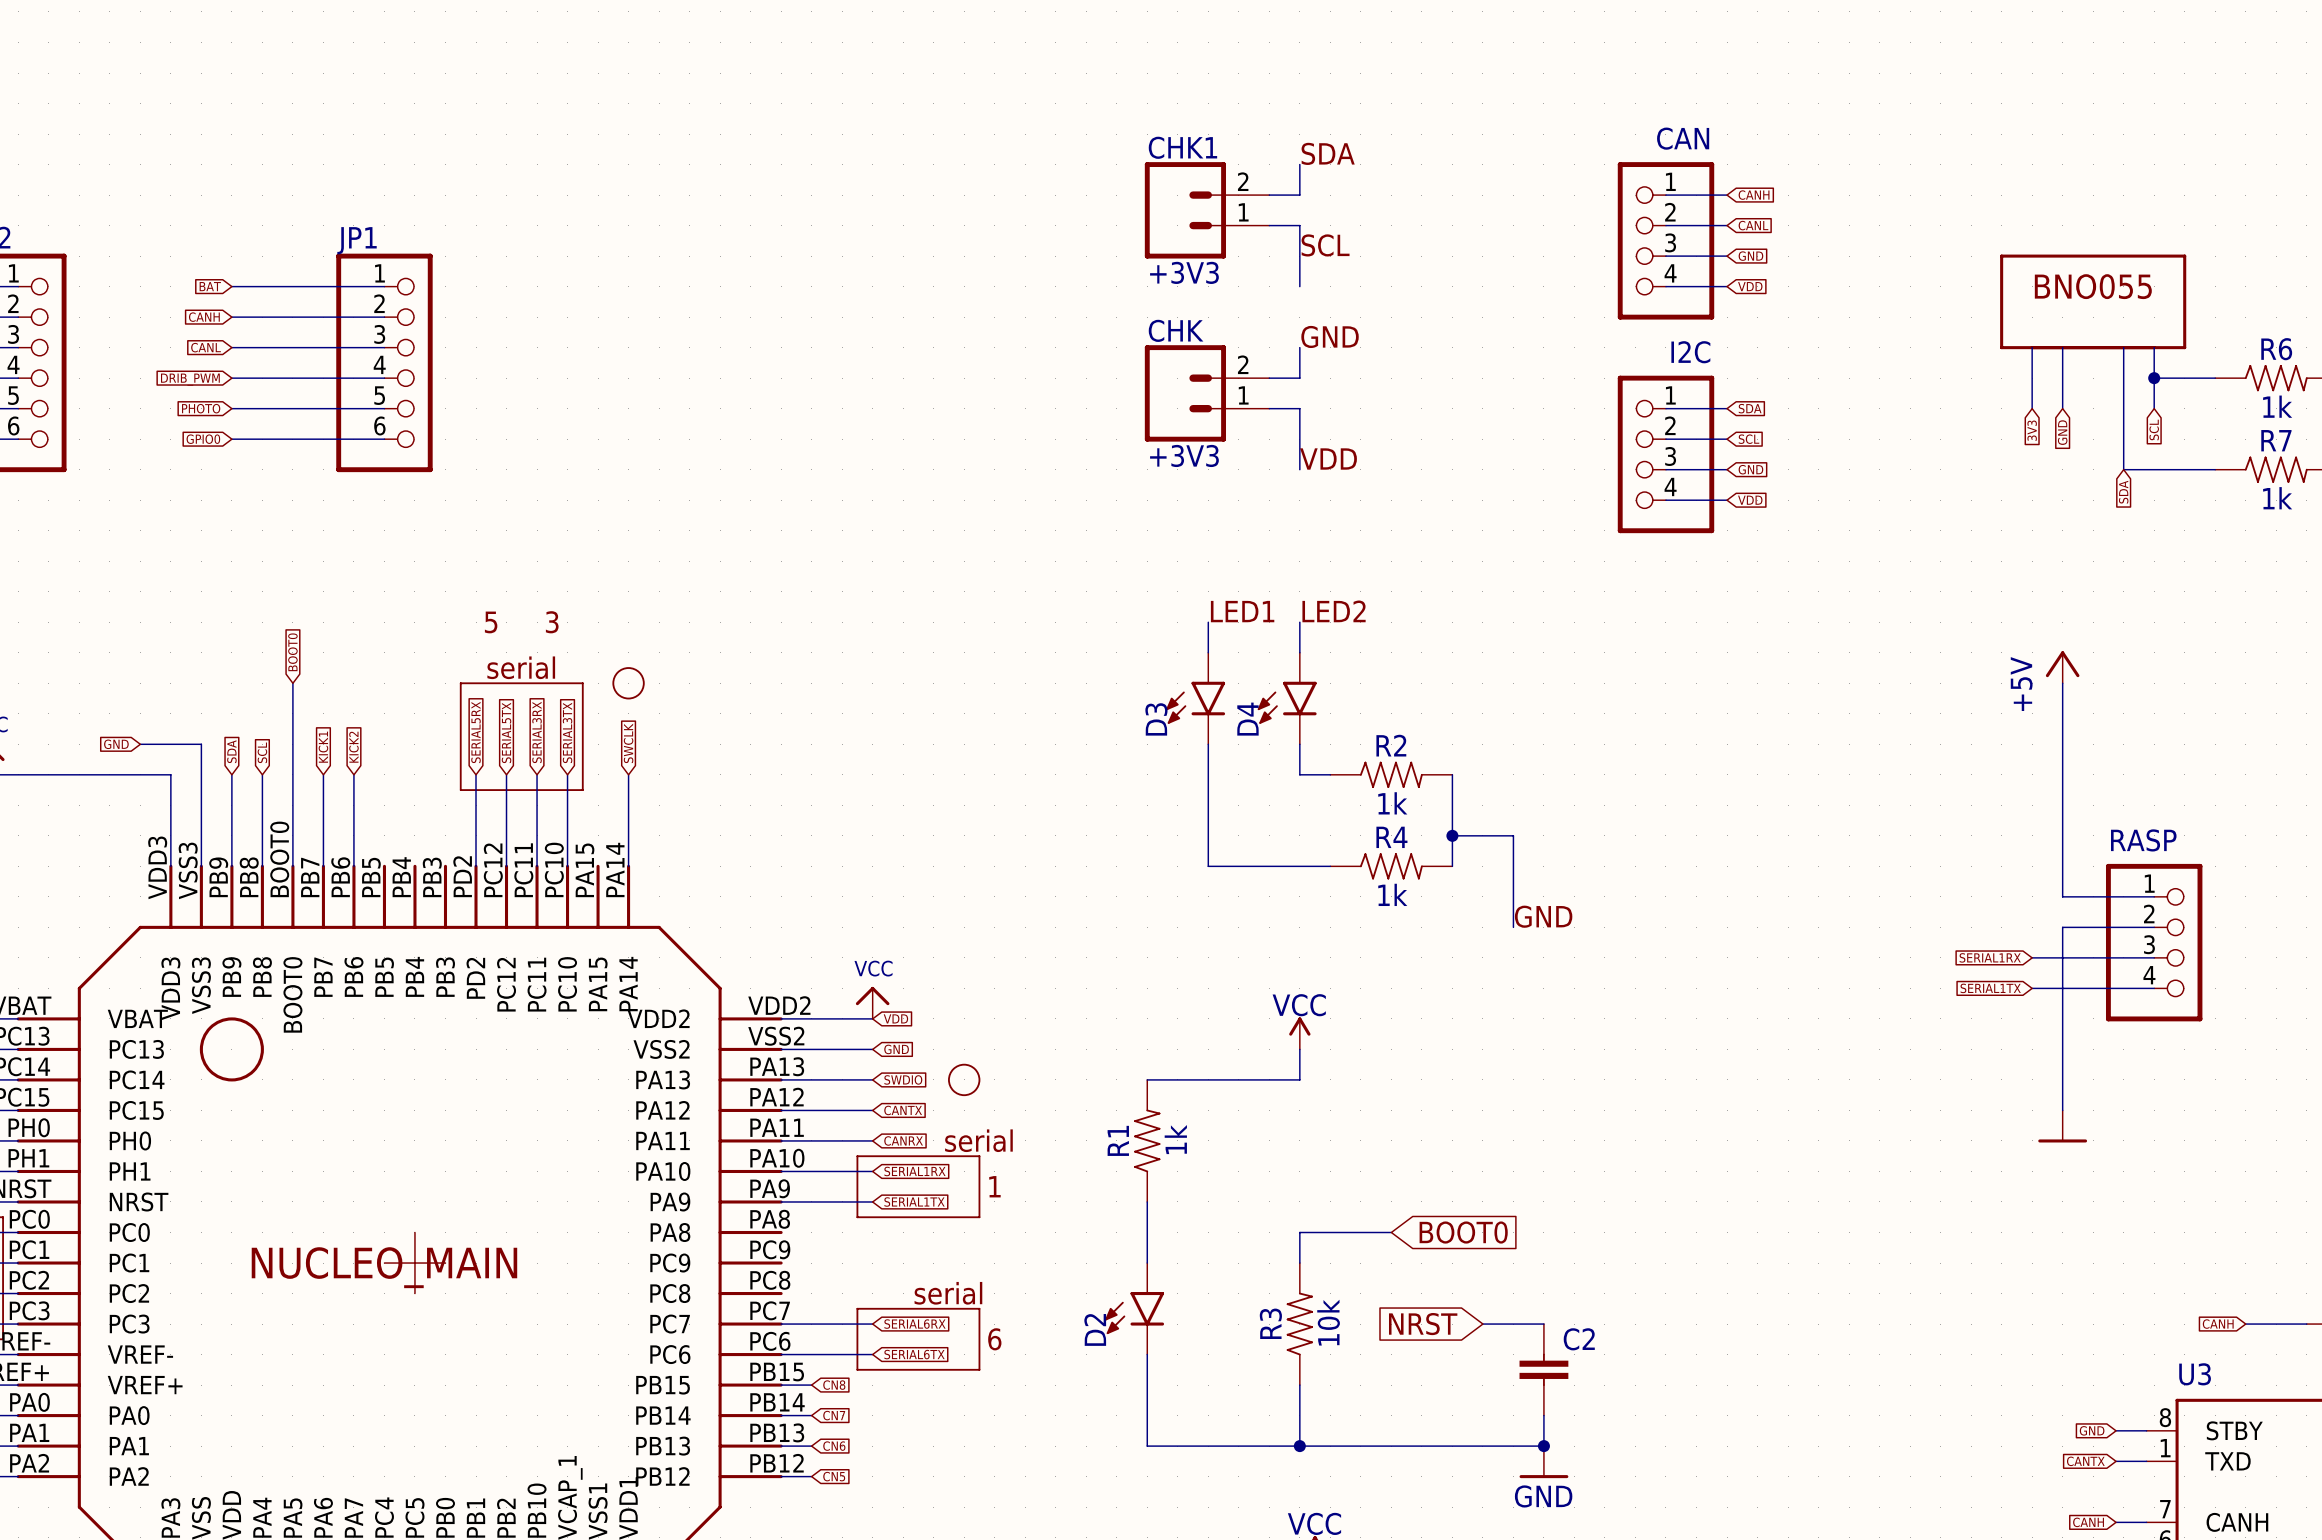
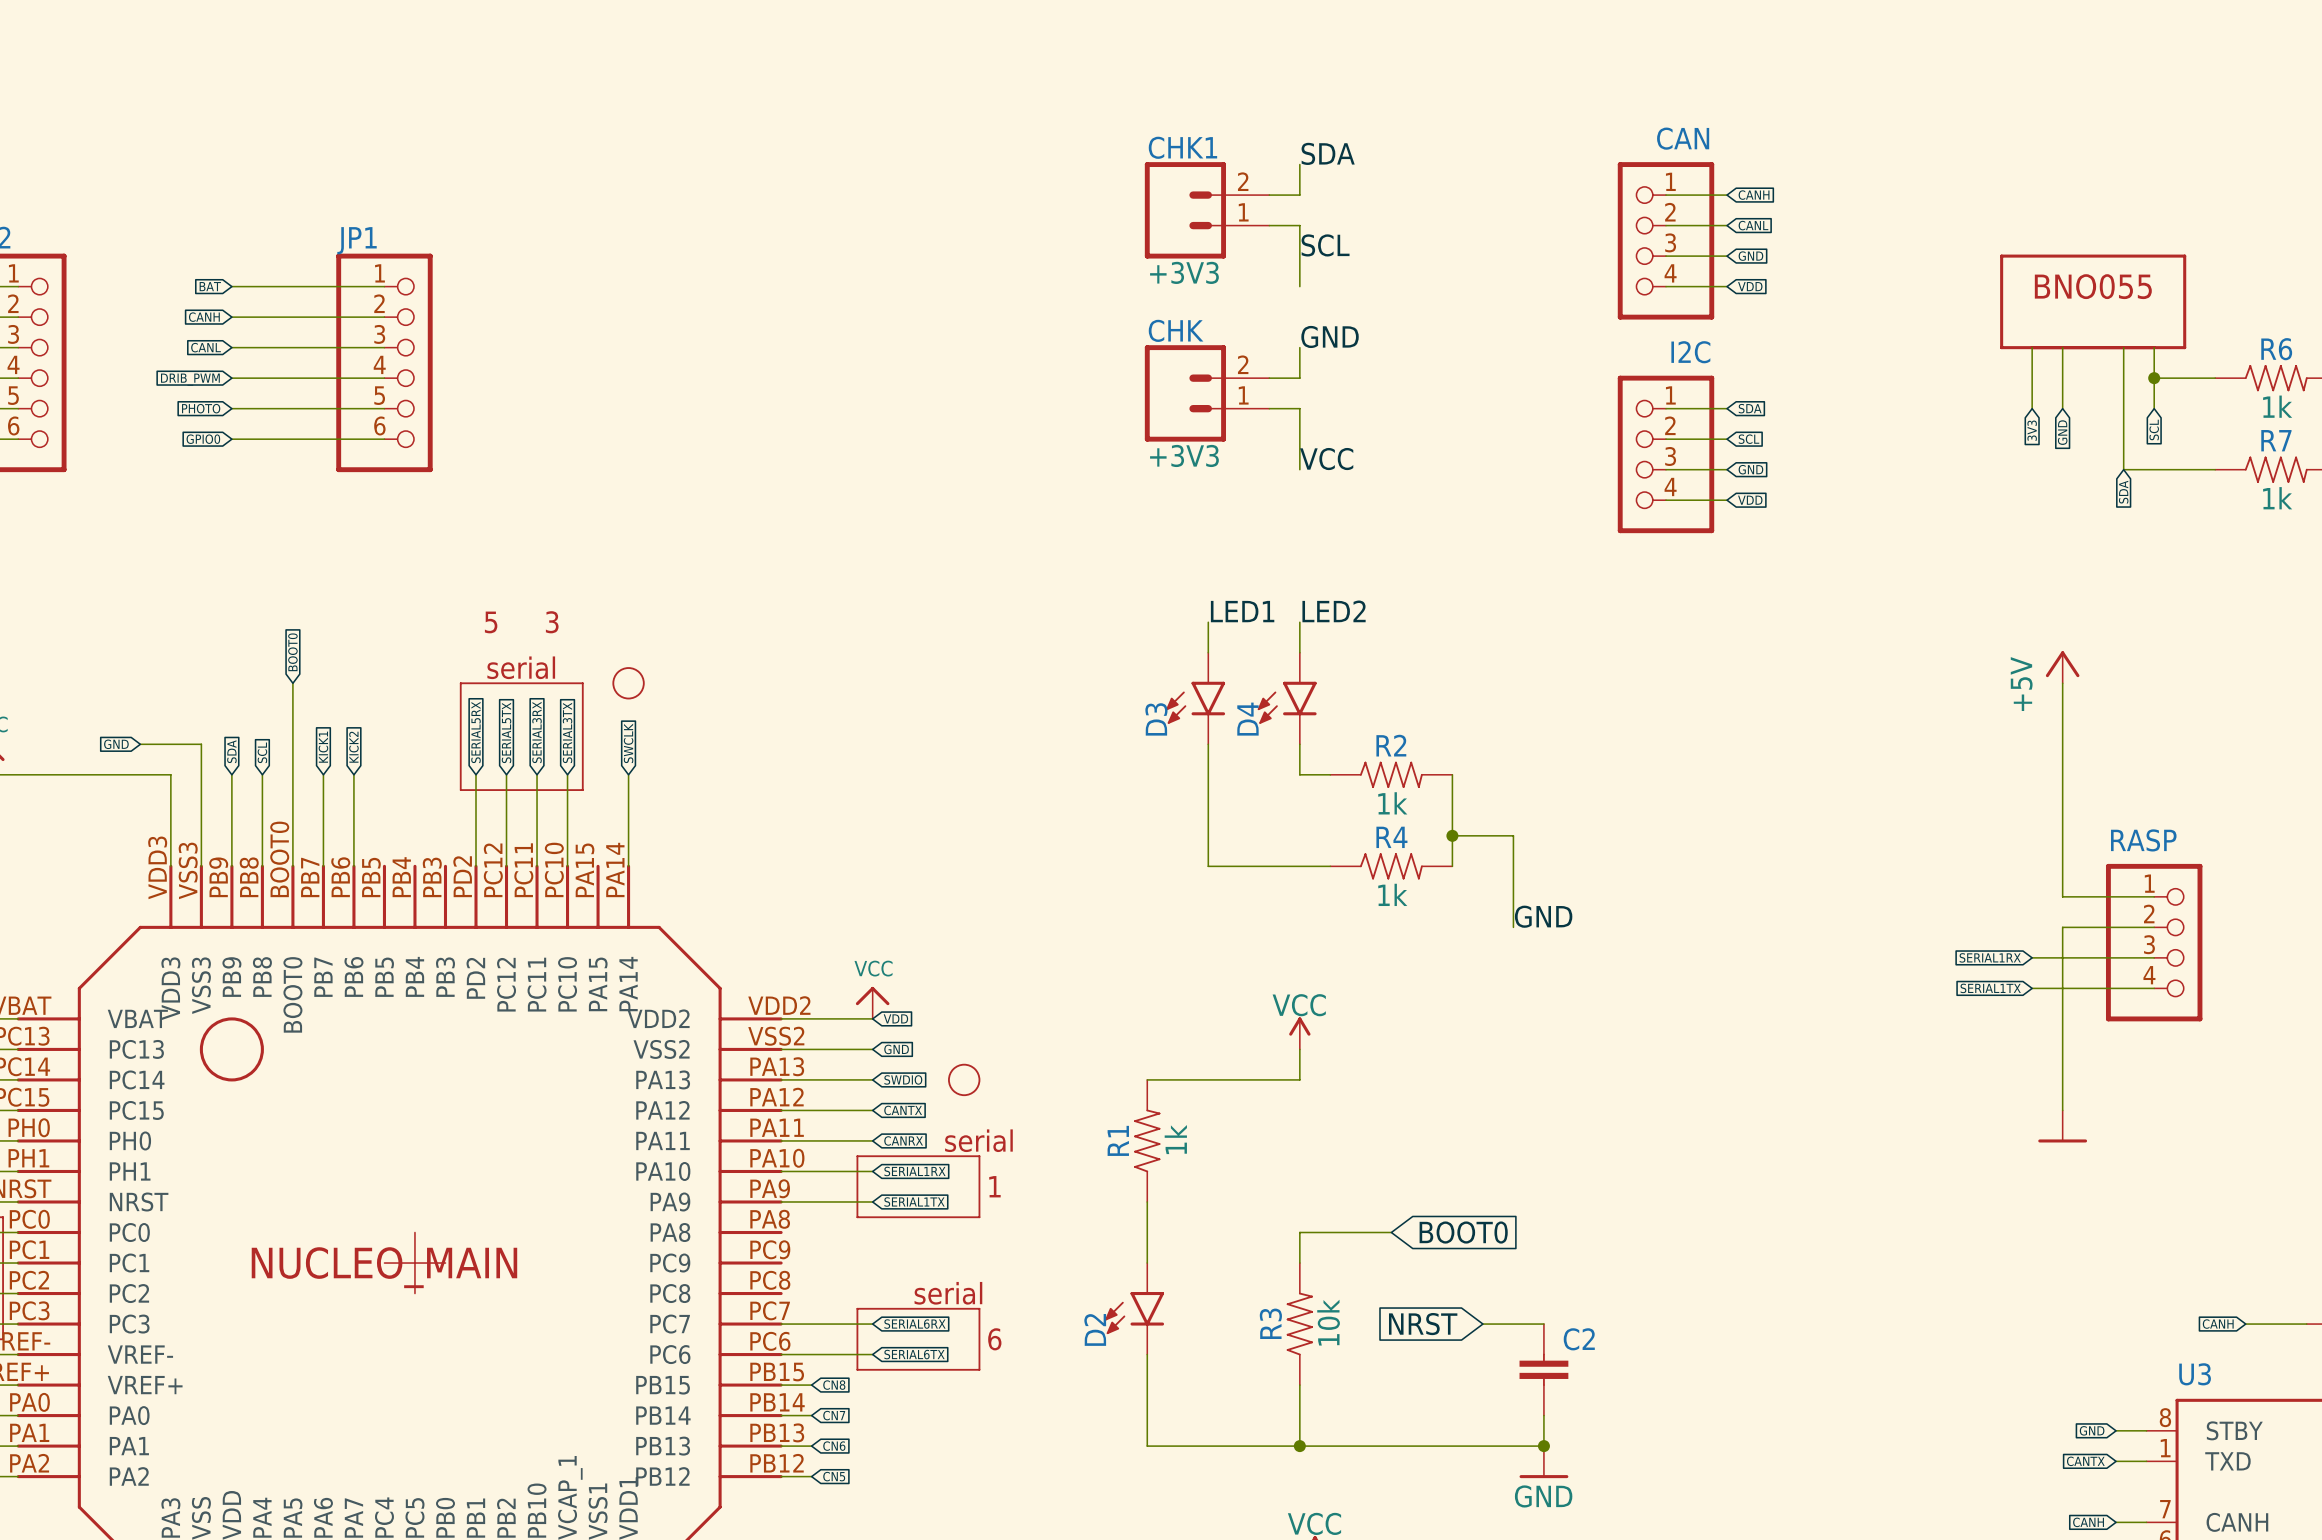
label: VDD (1328, 459) -> VCC (1326, 459)

